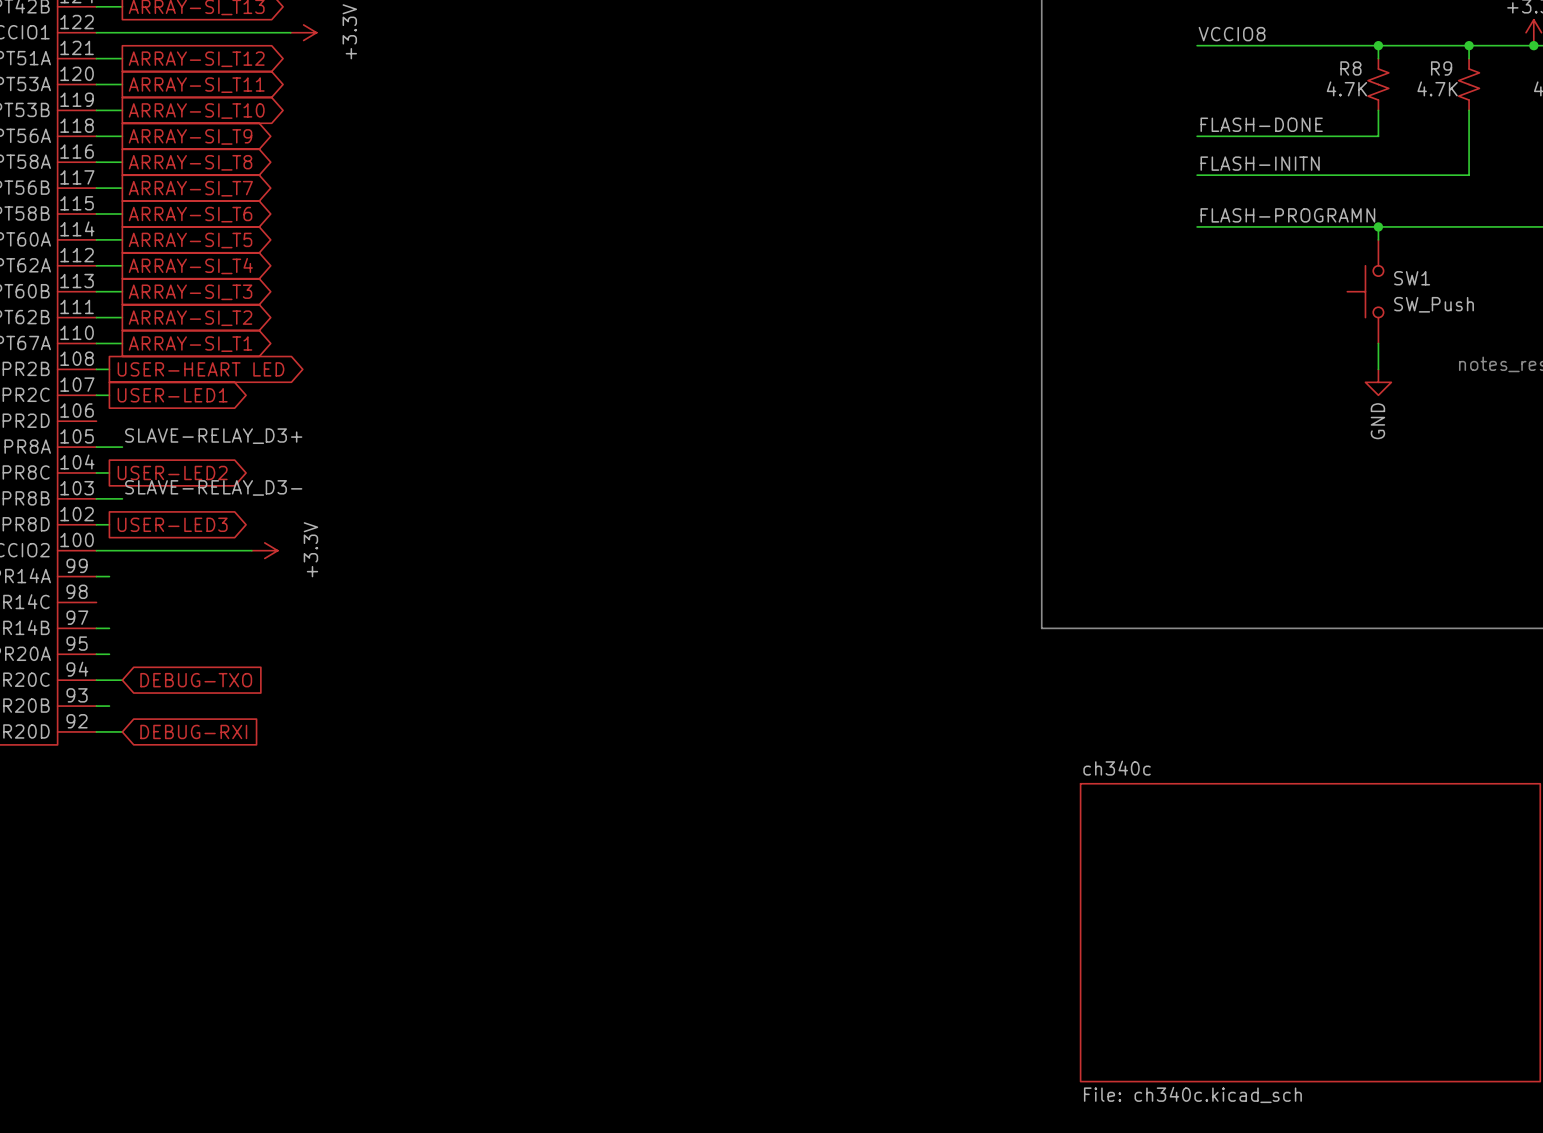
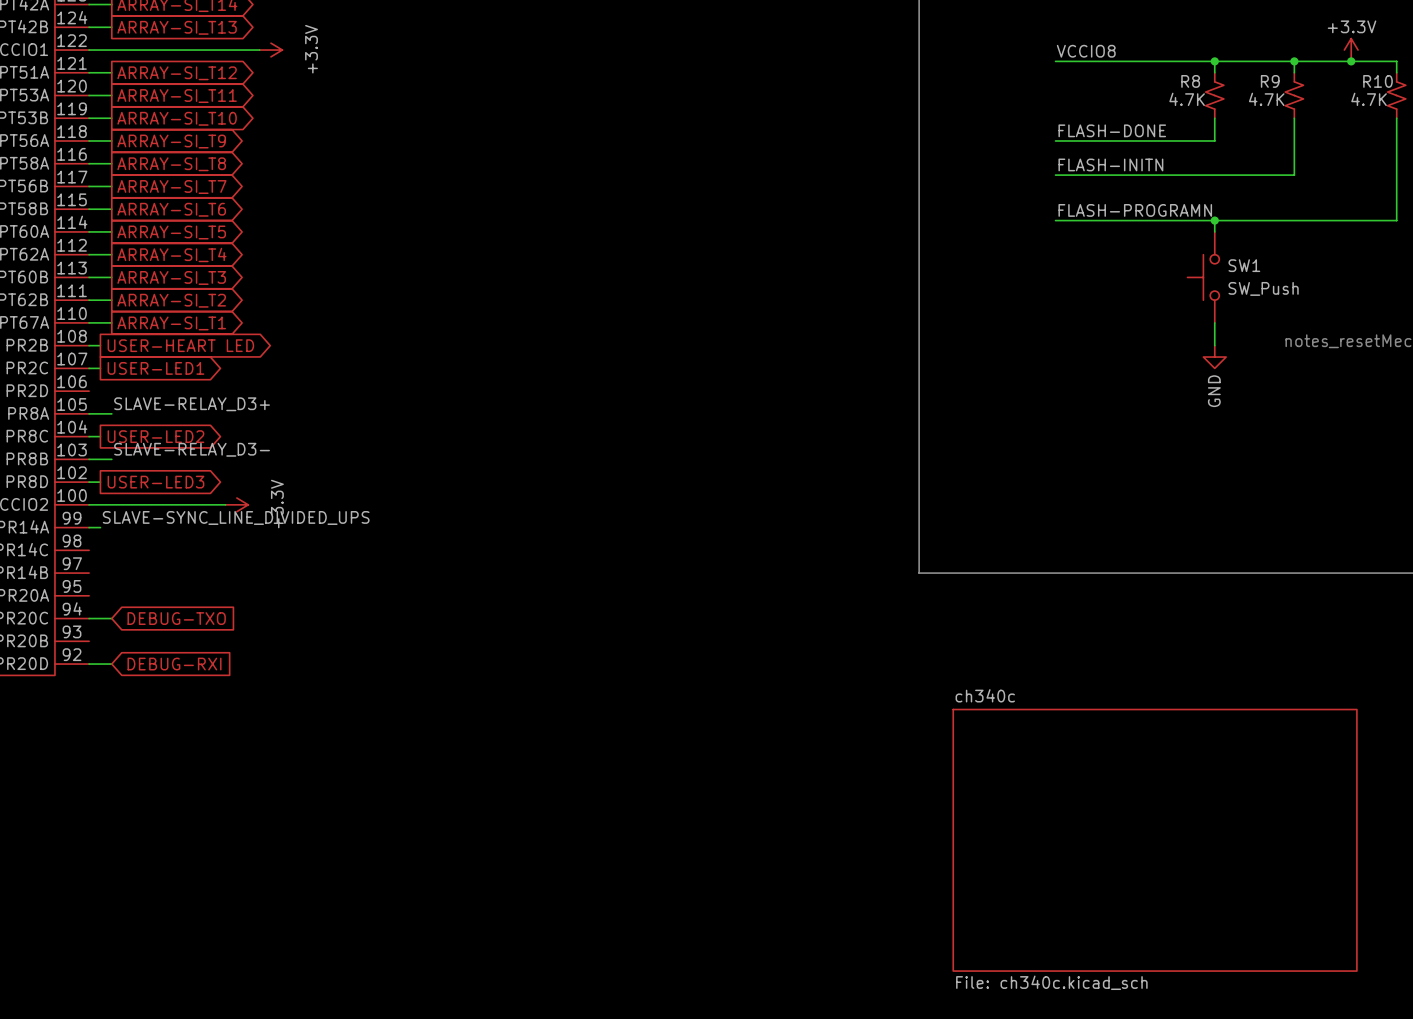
label: none -> SLAVE-SYNC_LINE_DIVIDED_UPS (236, 517)
wire: (96, 628) (109, 628) -> none
wire: (96, 654) (109, 654) -> none
wire: (96, 706) (109, 706) -> none

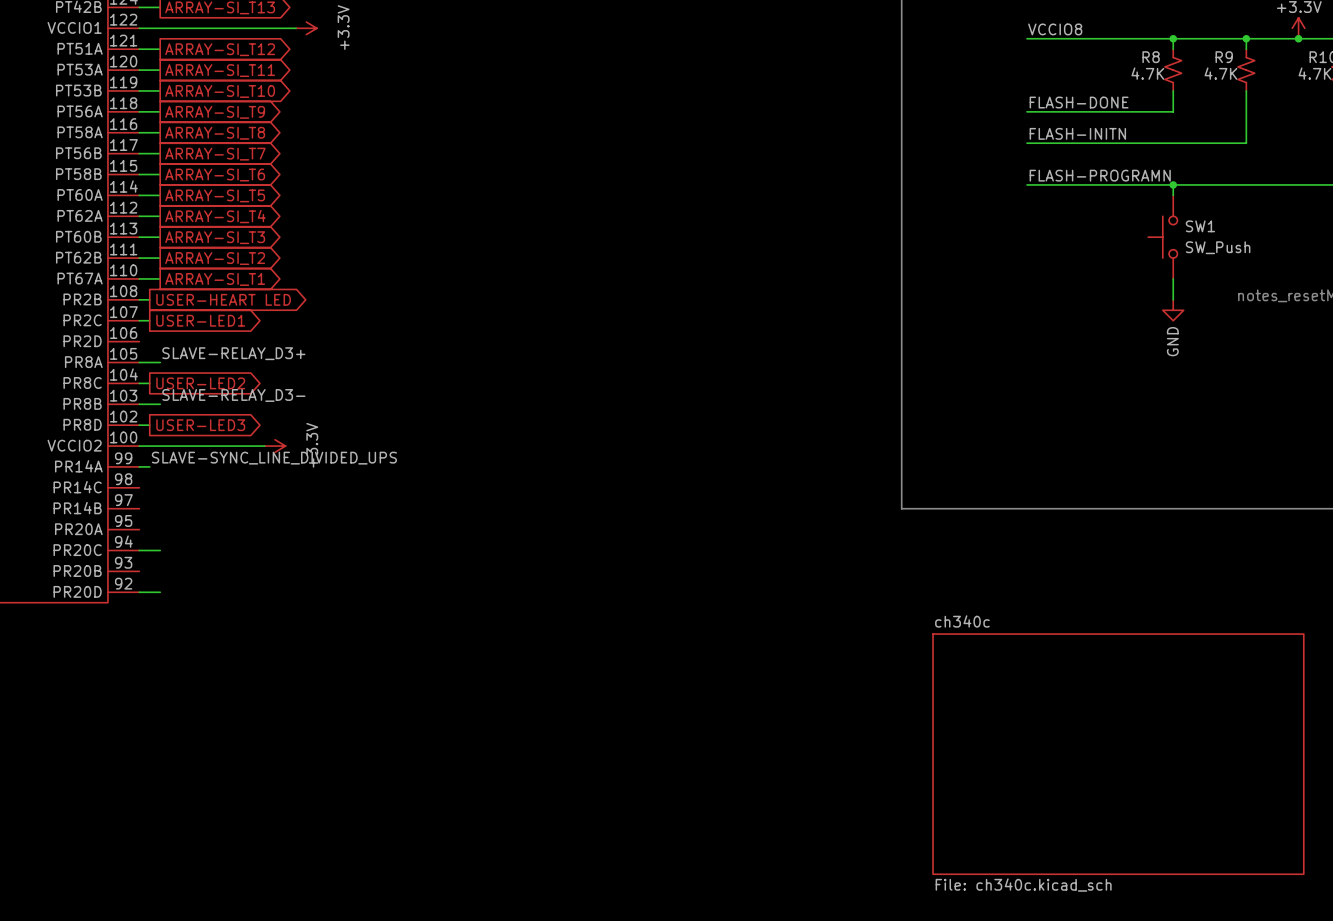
global label: DEBUG-TXO (176, 618) -> none
global label: DEBUG-RXI (174, 664) -> none

